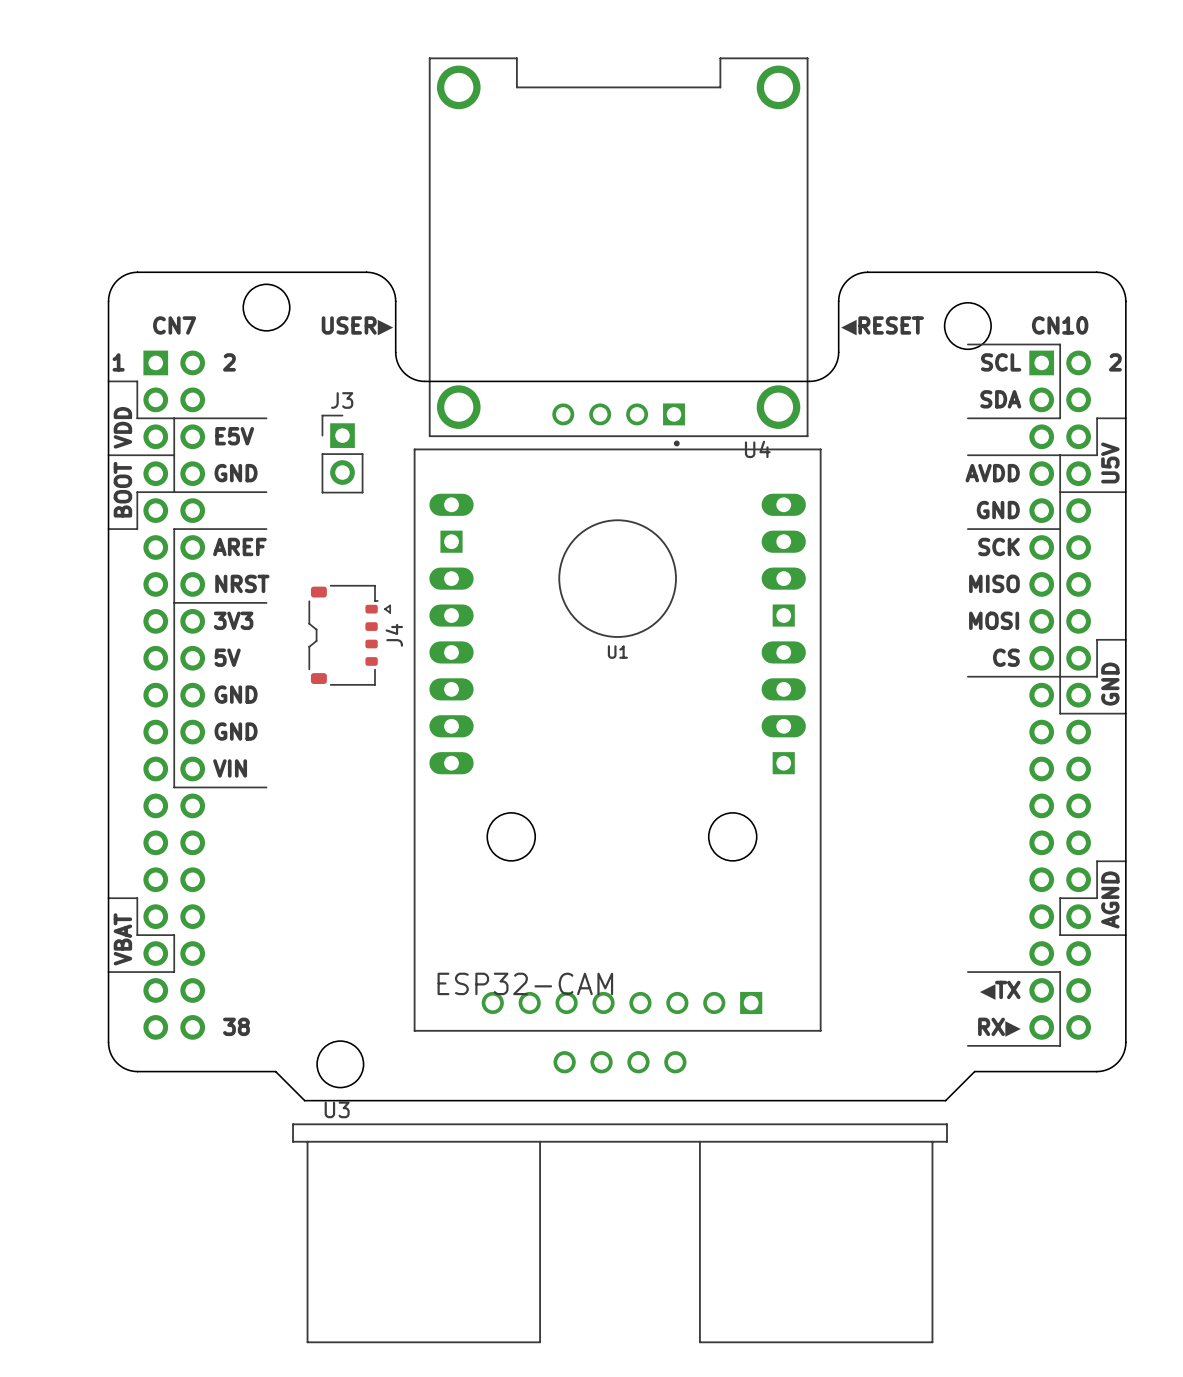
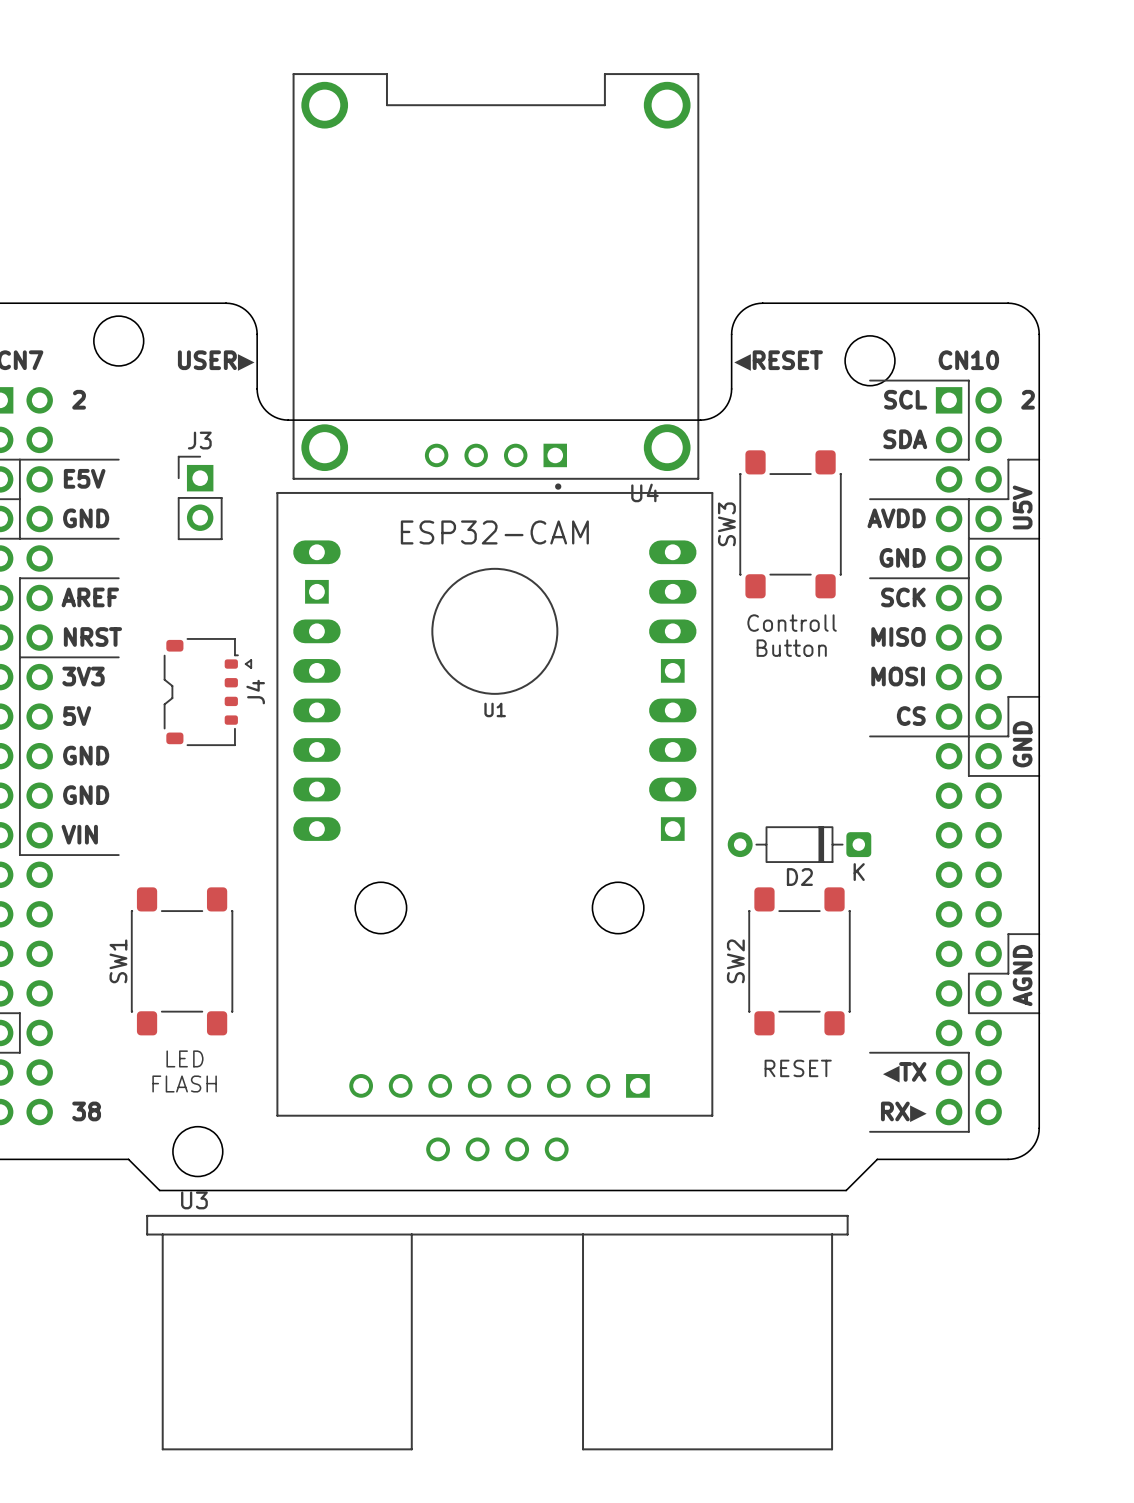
SW3: none -> (790, 524)
text: none -> Controll (792, 623)
text: none -> Button (791, 648)
D2: none -> (799, 844)
SW1: none -> (182, 961)
SW2: none -> (799, 961)
text: none -> LED (184, 1058)
U1 text position: ESP32-CAM (525, 983) -> ESP32-CAM (494, 532)
text: none -> RESET (798, 1068)
text: none -> FLASH (184, 1083)

